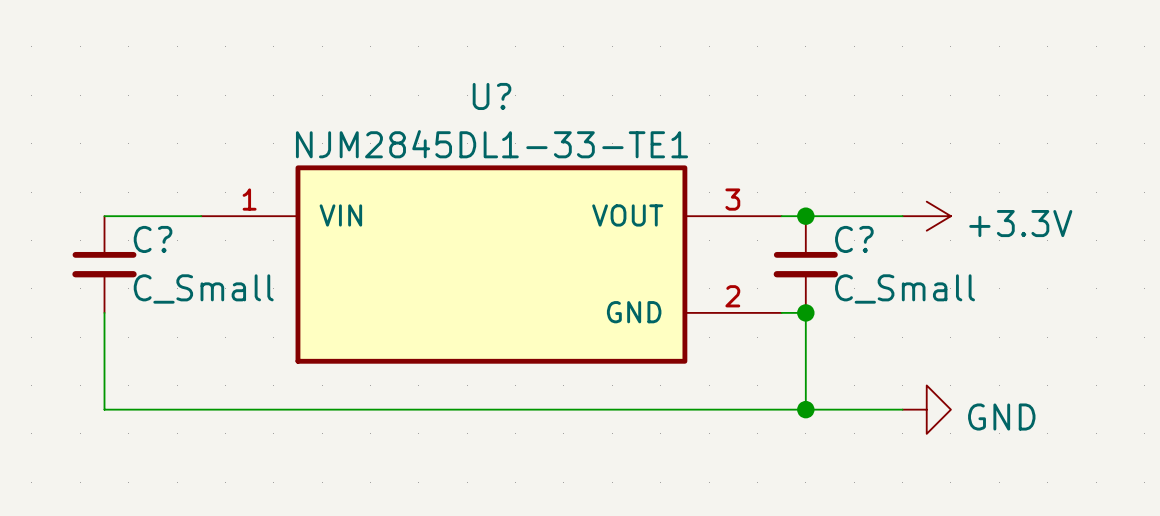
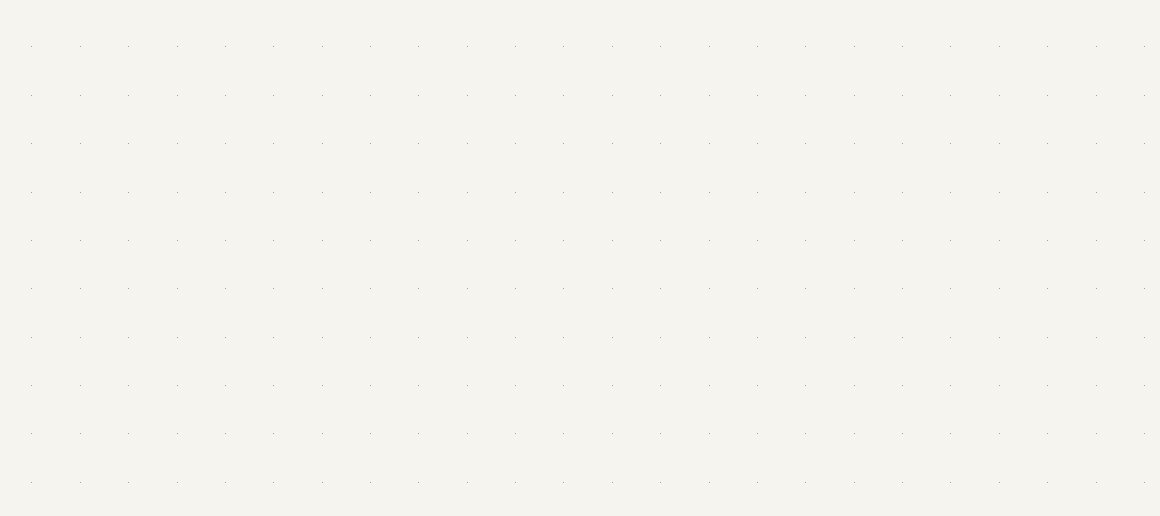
wire: (104, 216) (201, 216) -> none
wire: (781, 216) (902, 216) -> none
junction: (805, 216) -> none
power symbol: +3.3V (926, 216) -> none
C?: C_Small (104, 264) -> none
U?: NJM2845DL1-33-TE1 (491, 264) -> none
C?: C_Small (805, 264) -> none
wire: (104, 312) (104, 409) (902, 409) -> none
wire: (781, 312) (805, 312) (805, 409) -> none
junction: (805, 312) -> none
junction: (805, 409) -> none
power symbol: GND (926, 409) -> none

